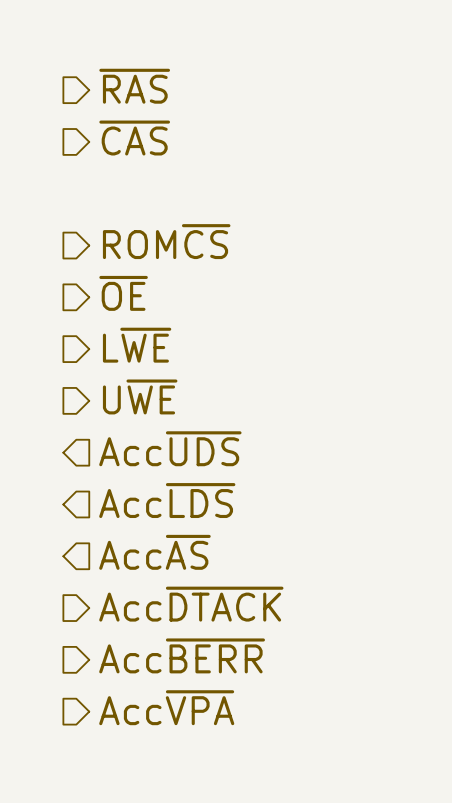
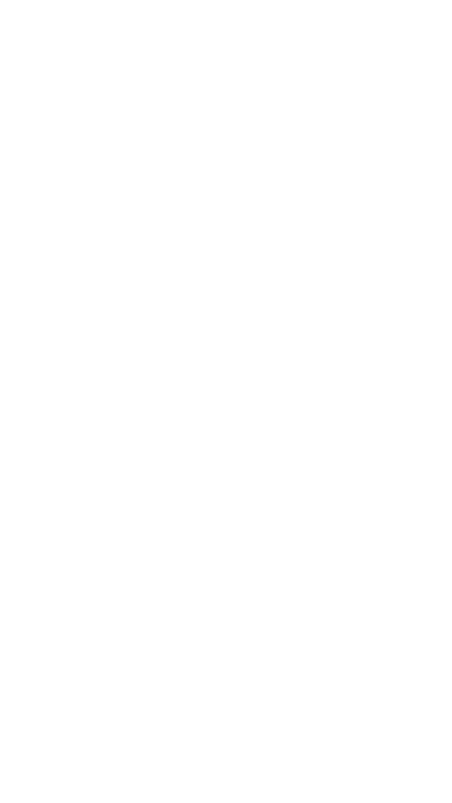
hierarchical label: ~{RAS} (134, 86) -> none
hierarchical label: ~{CAS} (134, 138) -> none
hierarchical label: ROM~{CS} (166, 241) -> none
hierarchical label: ~{OE} (123, 293) -> none
hierarchical label: L~{WE} (137, 345) -> none
hierarchical label: U~{WE} (140, 396) -> none
hierarchical label: Acc~{UDS} (170, 448) -> none
hierarchical label: Acc~{LDS} (167, 500) -> none
hierarchical label: Acc~{AS} (154, 552) -> none
hierarchical label: Acc~{DTACK} (191, 604) -> none
hierarchical label: Acc~{BERR} (182, 655) -> none
hierarchical label: Acc~{VPA} (166, 707) -> none

